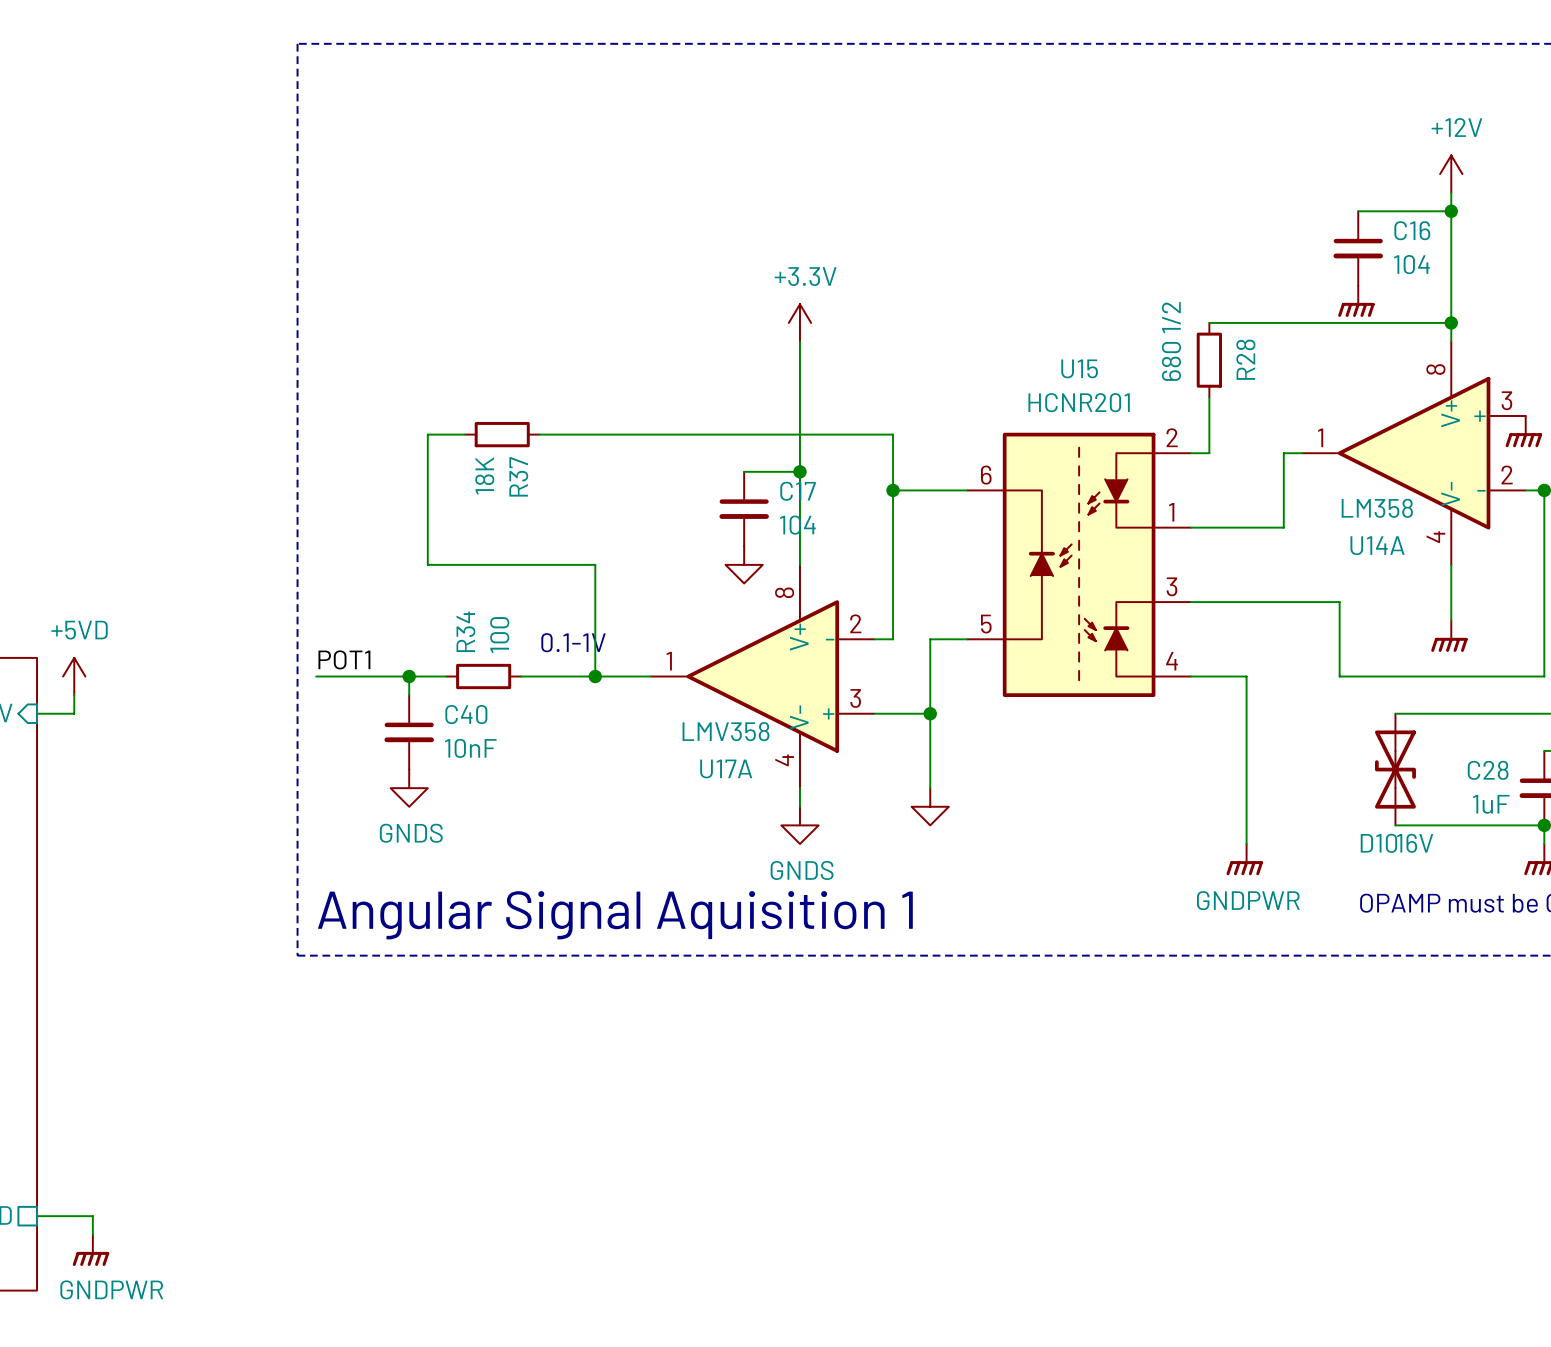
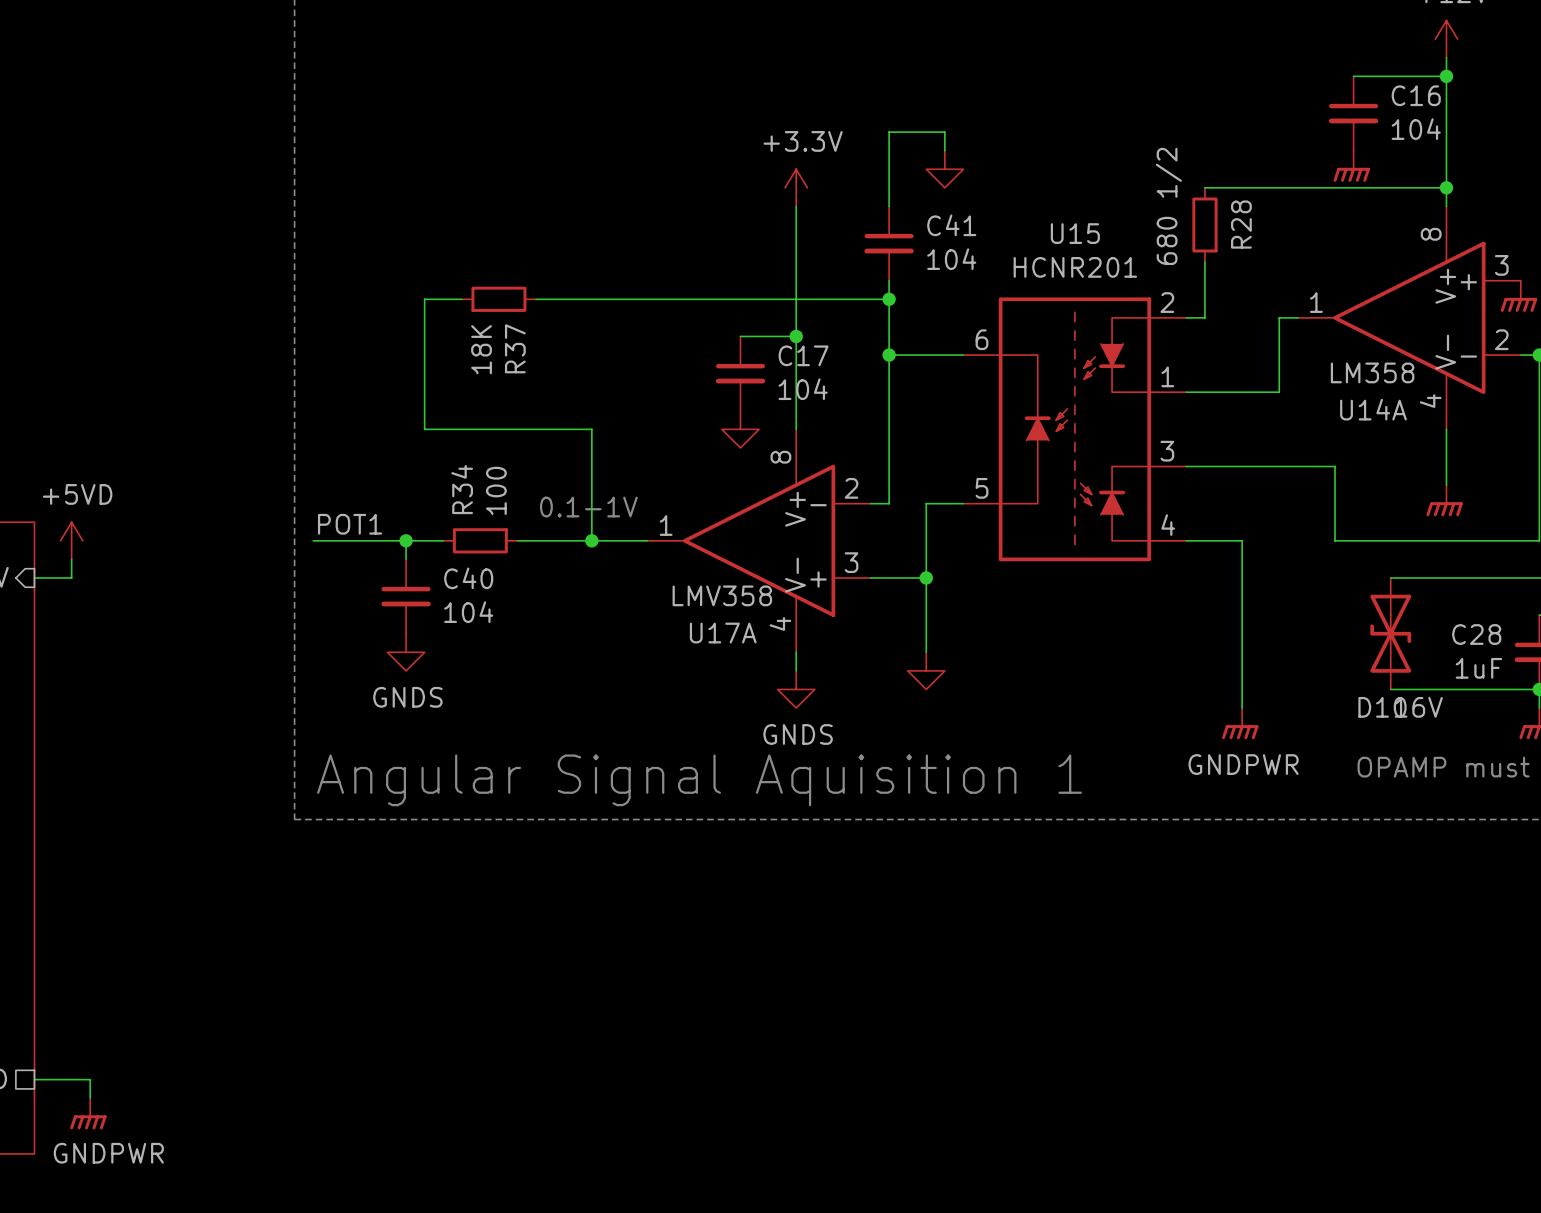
wire: none -> (944, 150) (944, 132) (889, 132) (889, 206)
power symbol: none -> (944, 169)
C41: none -> 104 (889, 243)
wire: none -> (889, 280) (889, 299)
junction: none -> (889, 299)
C40 value: 10nF (470, 748) -> 104 (468, 612)

